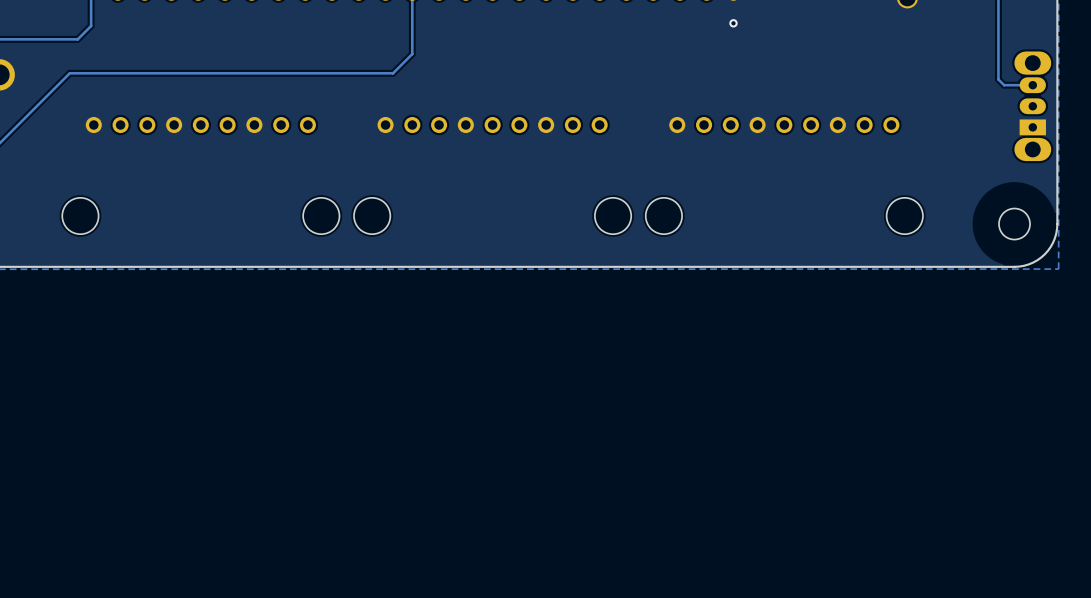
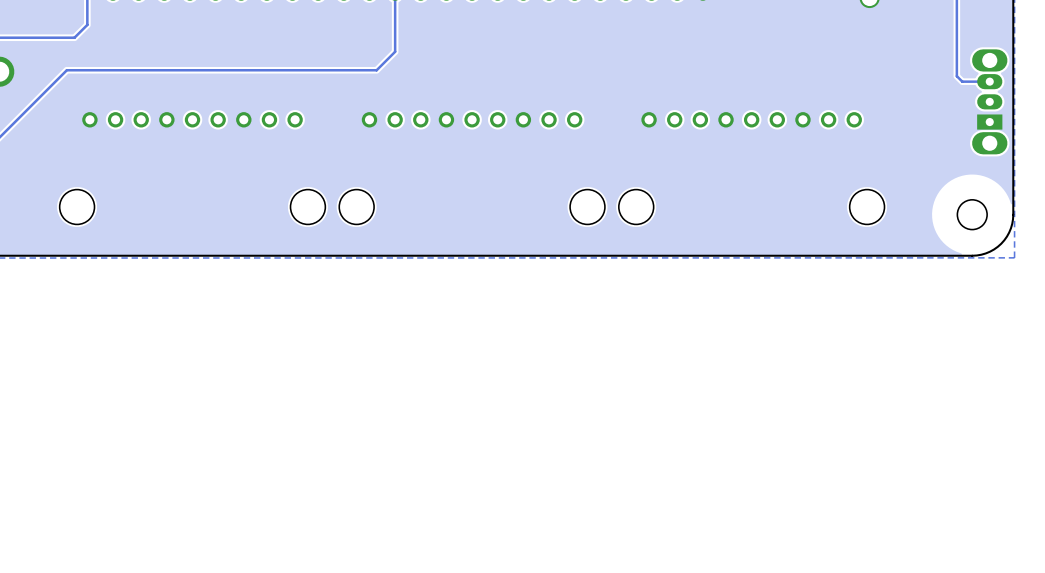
via: (733, 23) -> none

